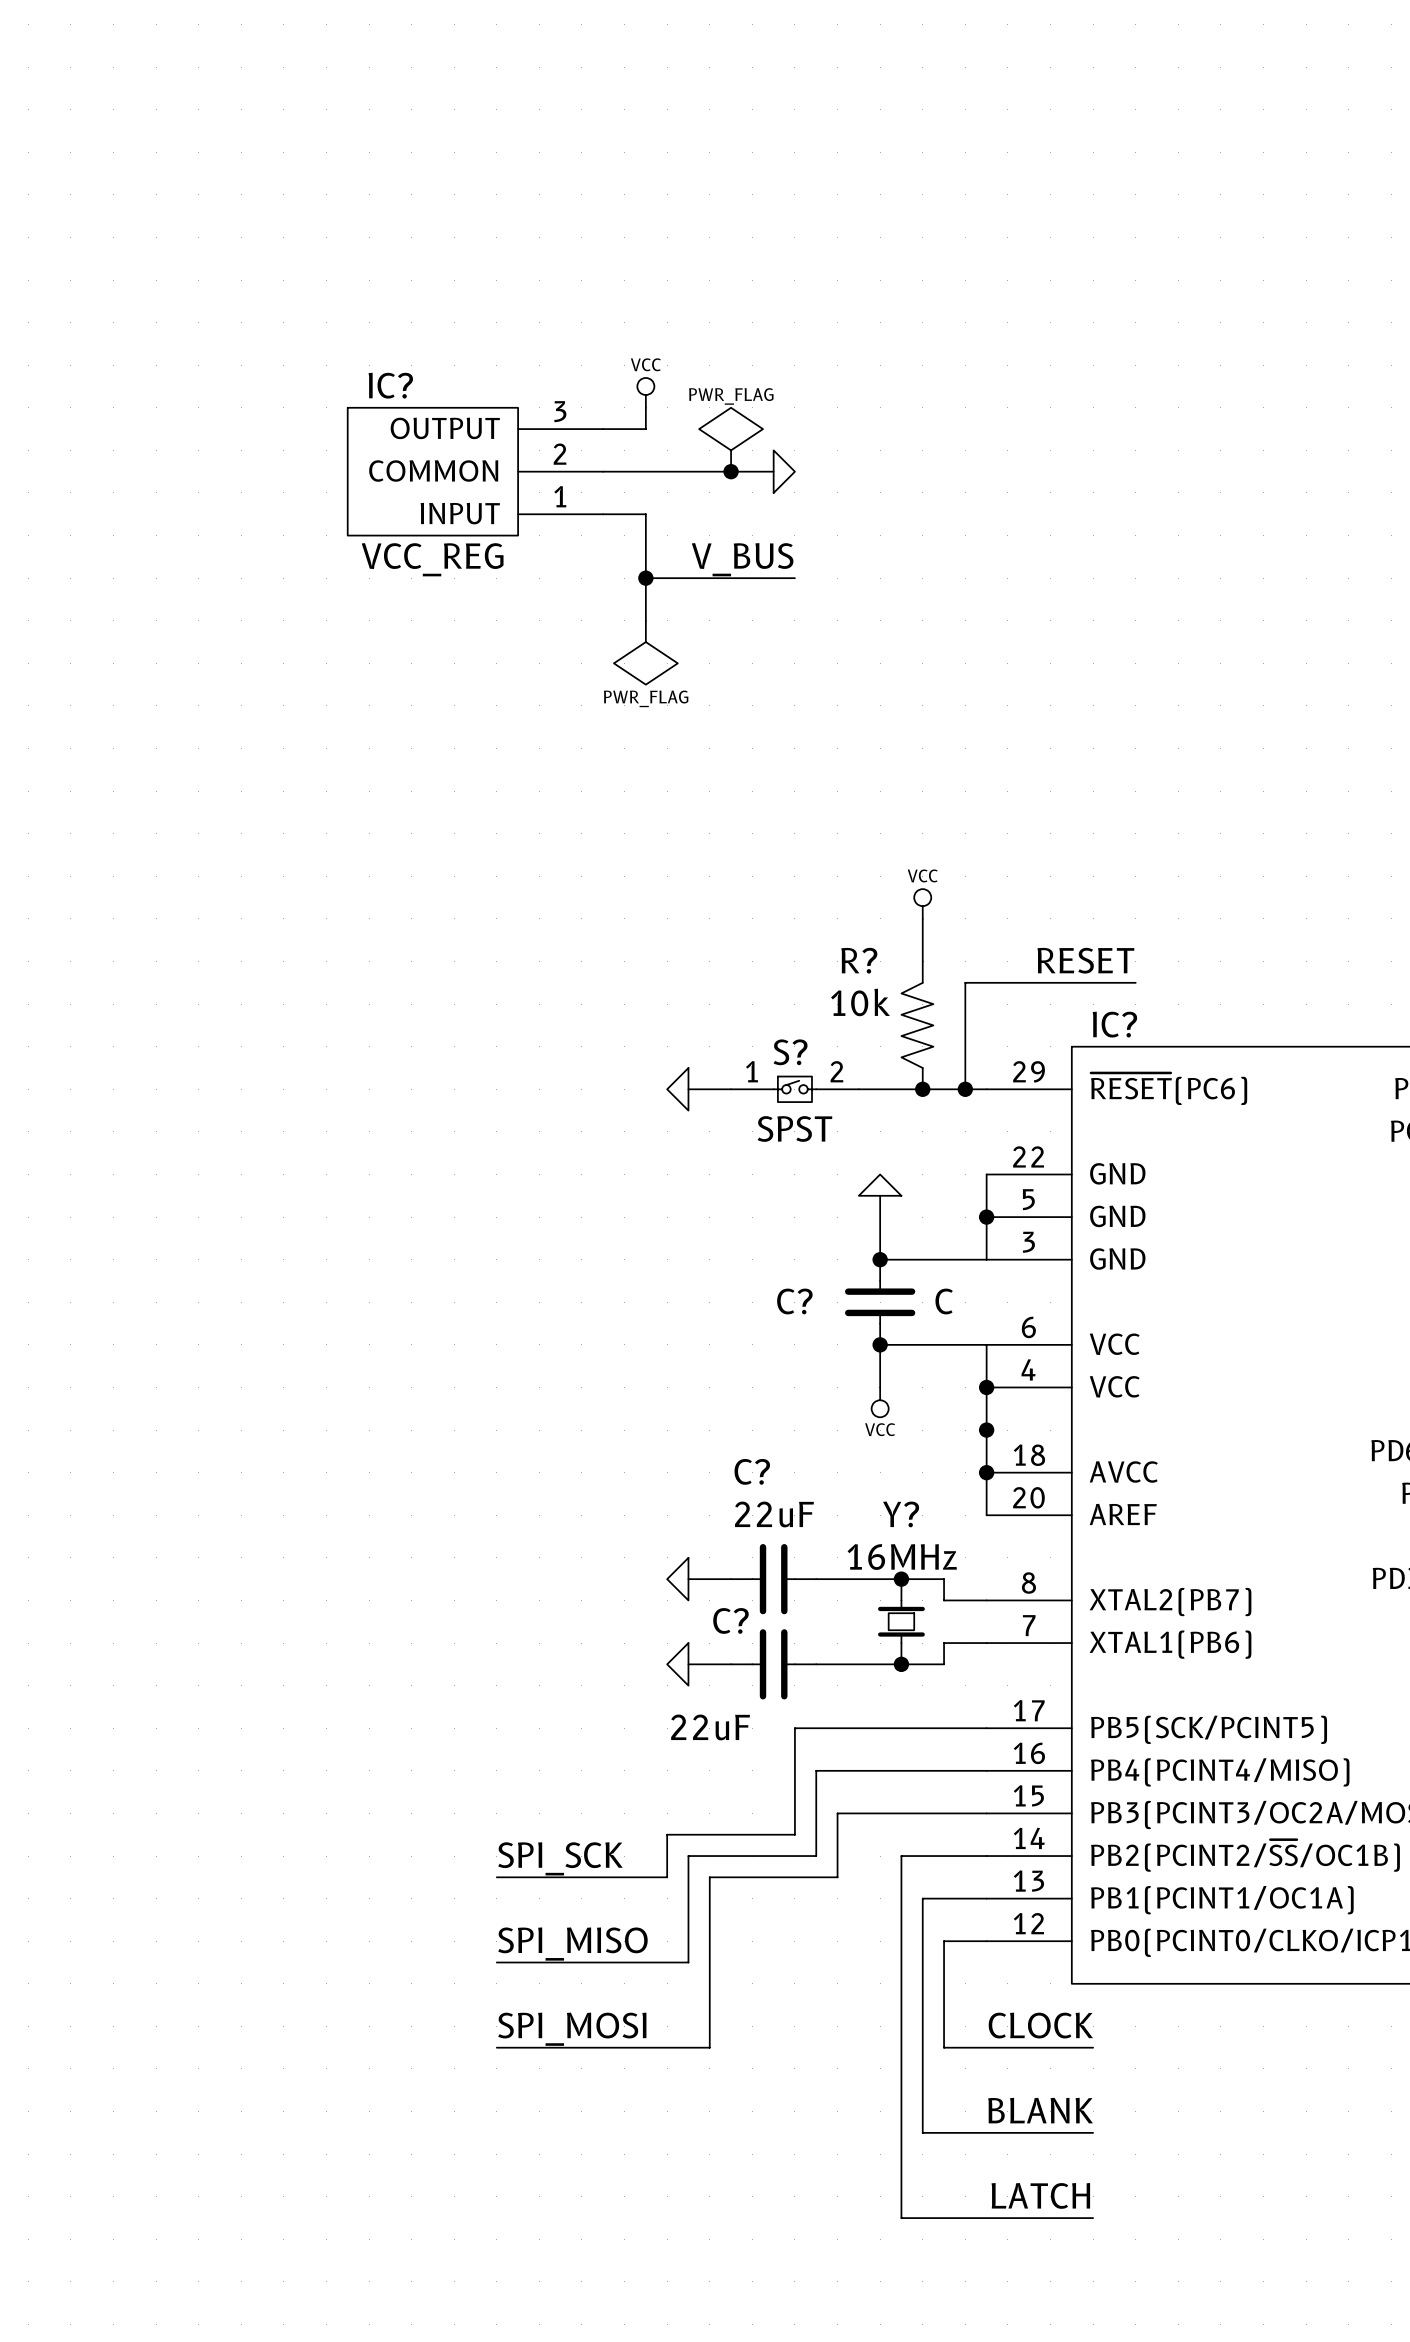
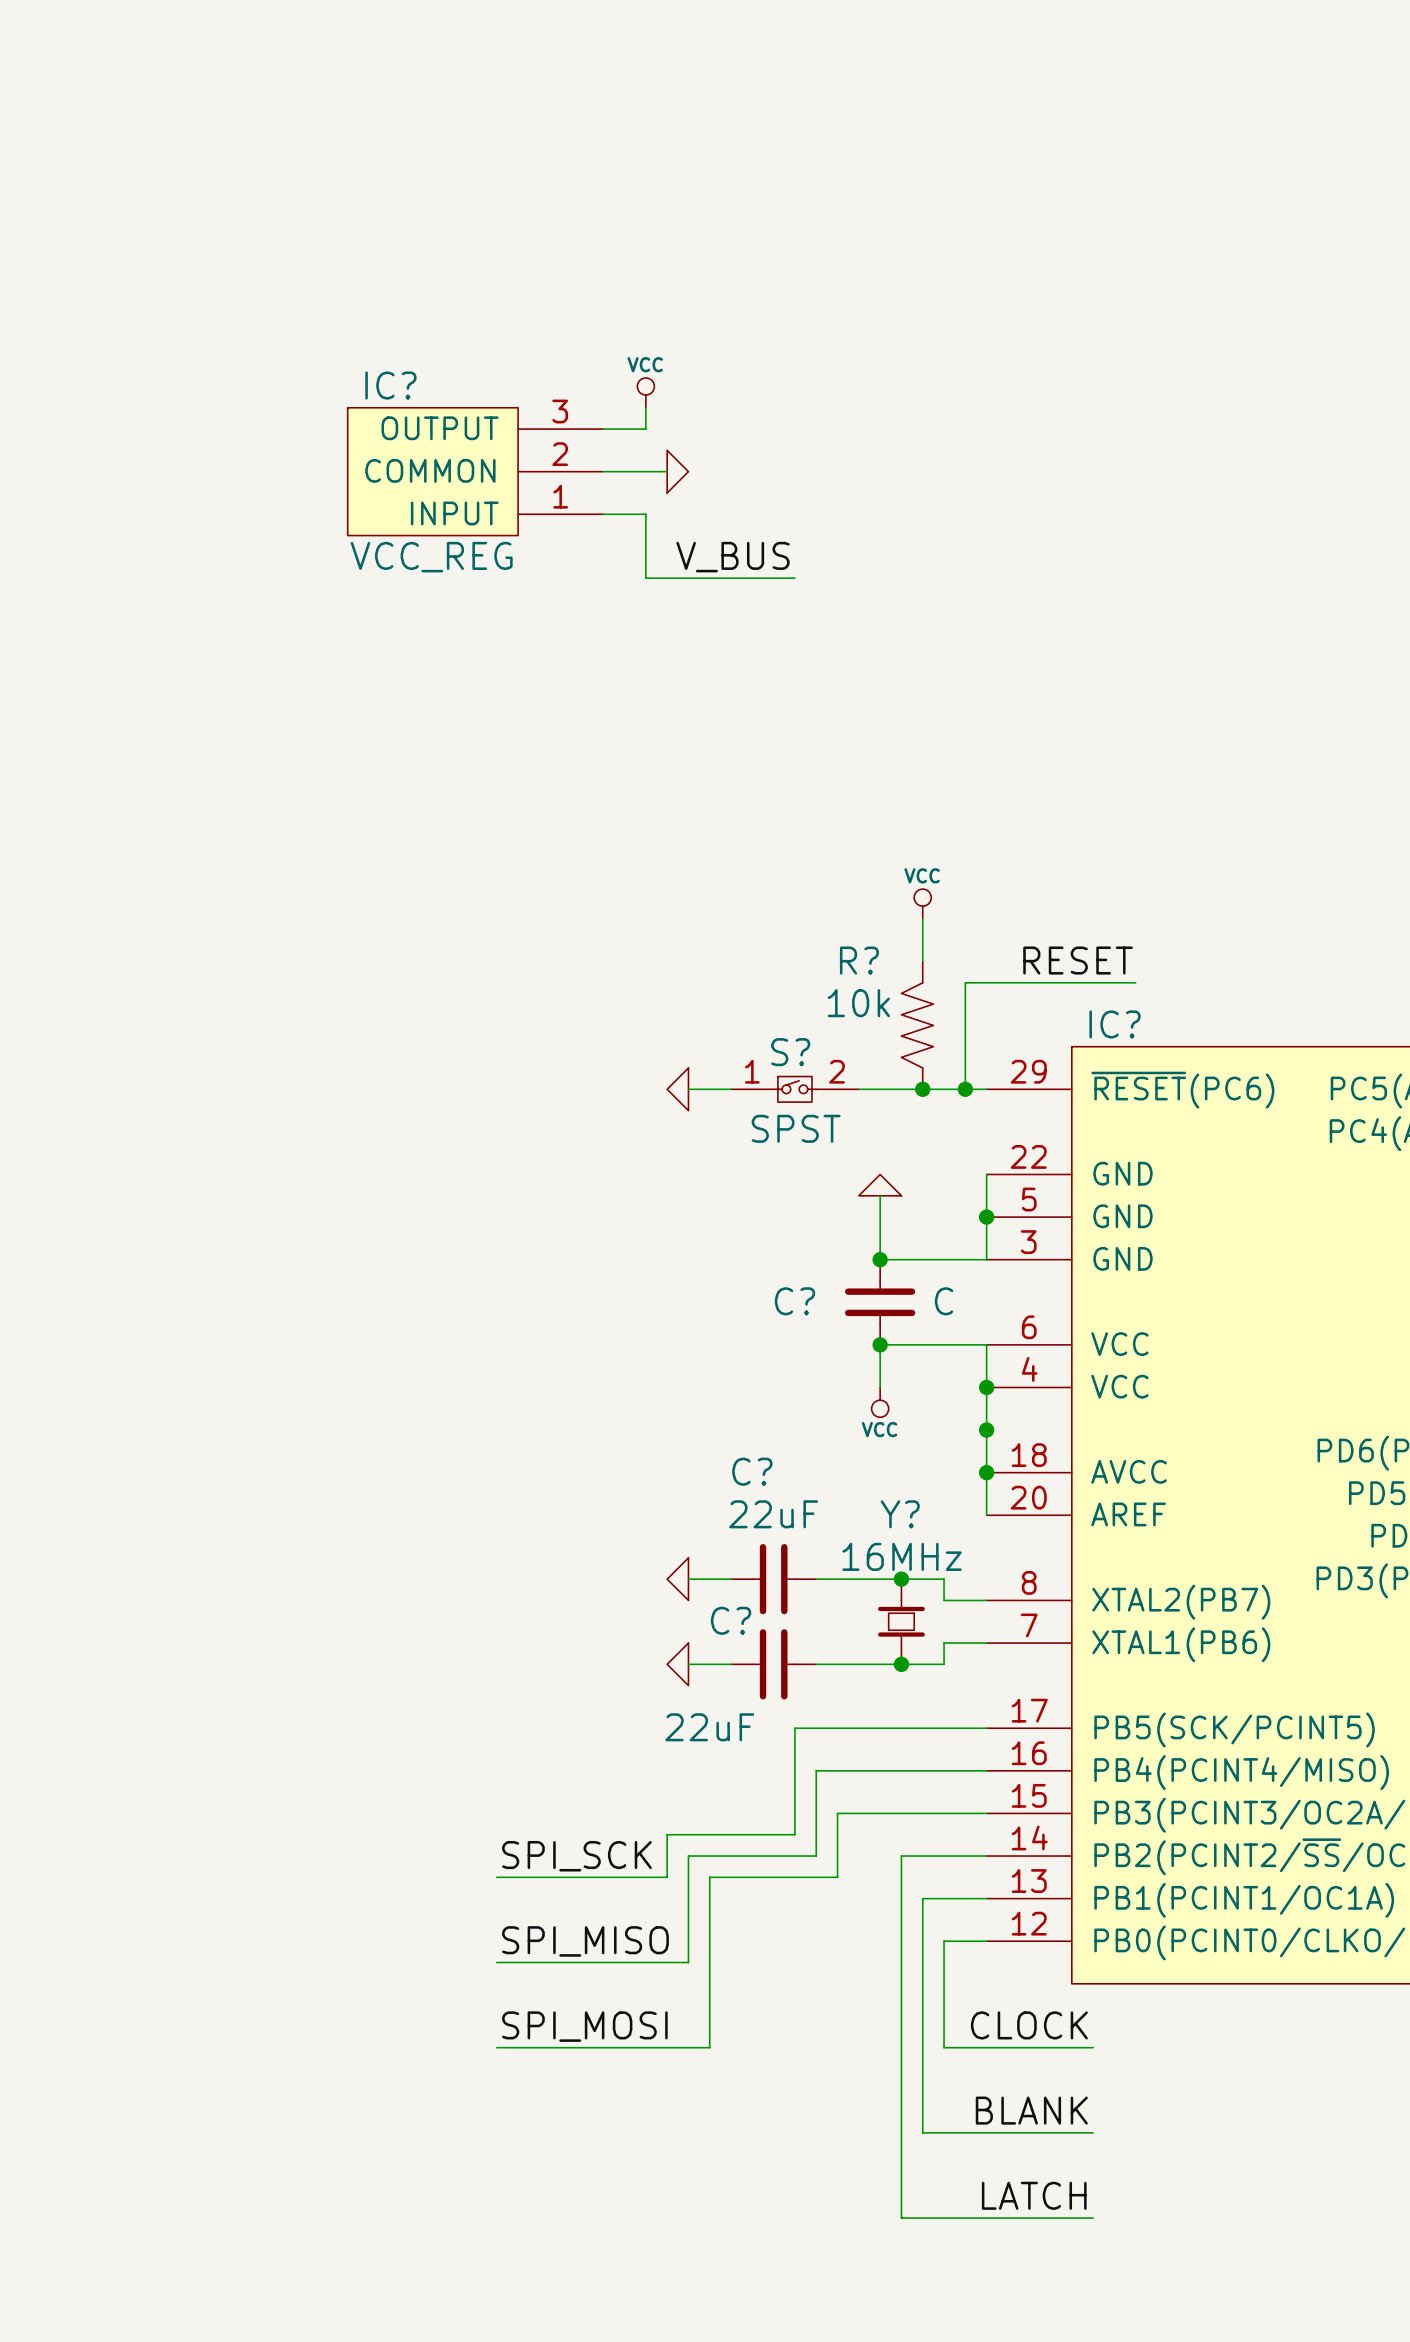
power symbol: PWR_FLAG (731, 439) -> none
wire: (667, 471) (773, 471) -> none
junction: (731, 471) -> none
power symbol position: (784, 471) -> (677, 471)
wire: (645, 578) (645, 620) -> none
junction: (645, 578) -> none
power symbol: PWR_FLAG (645, 652) -> none

